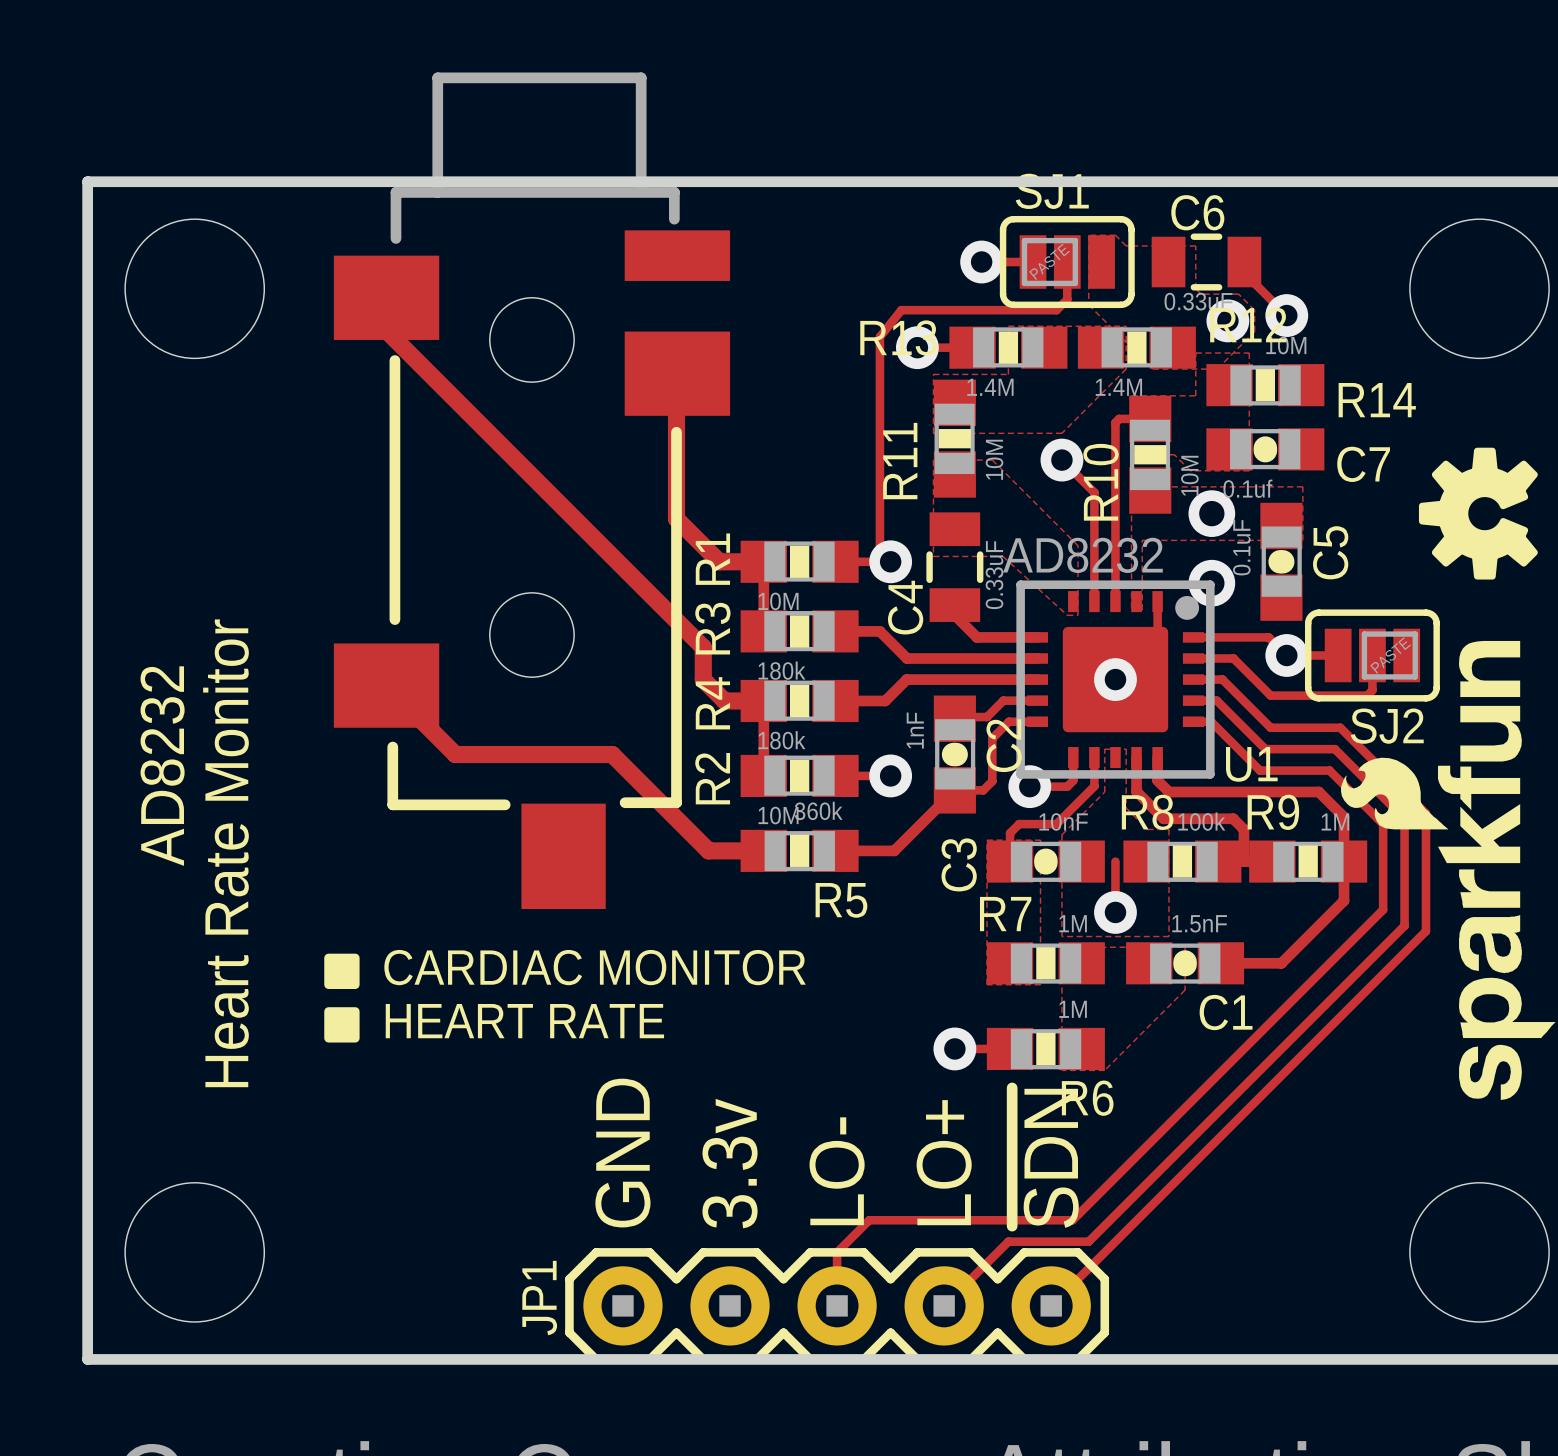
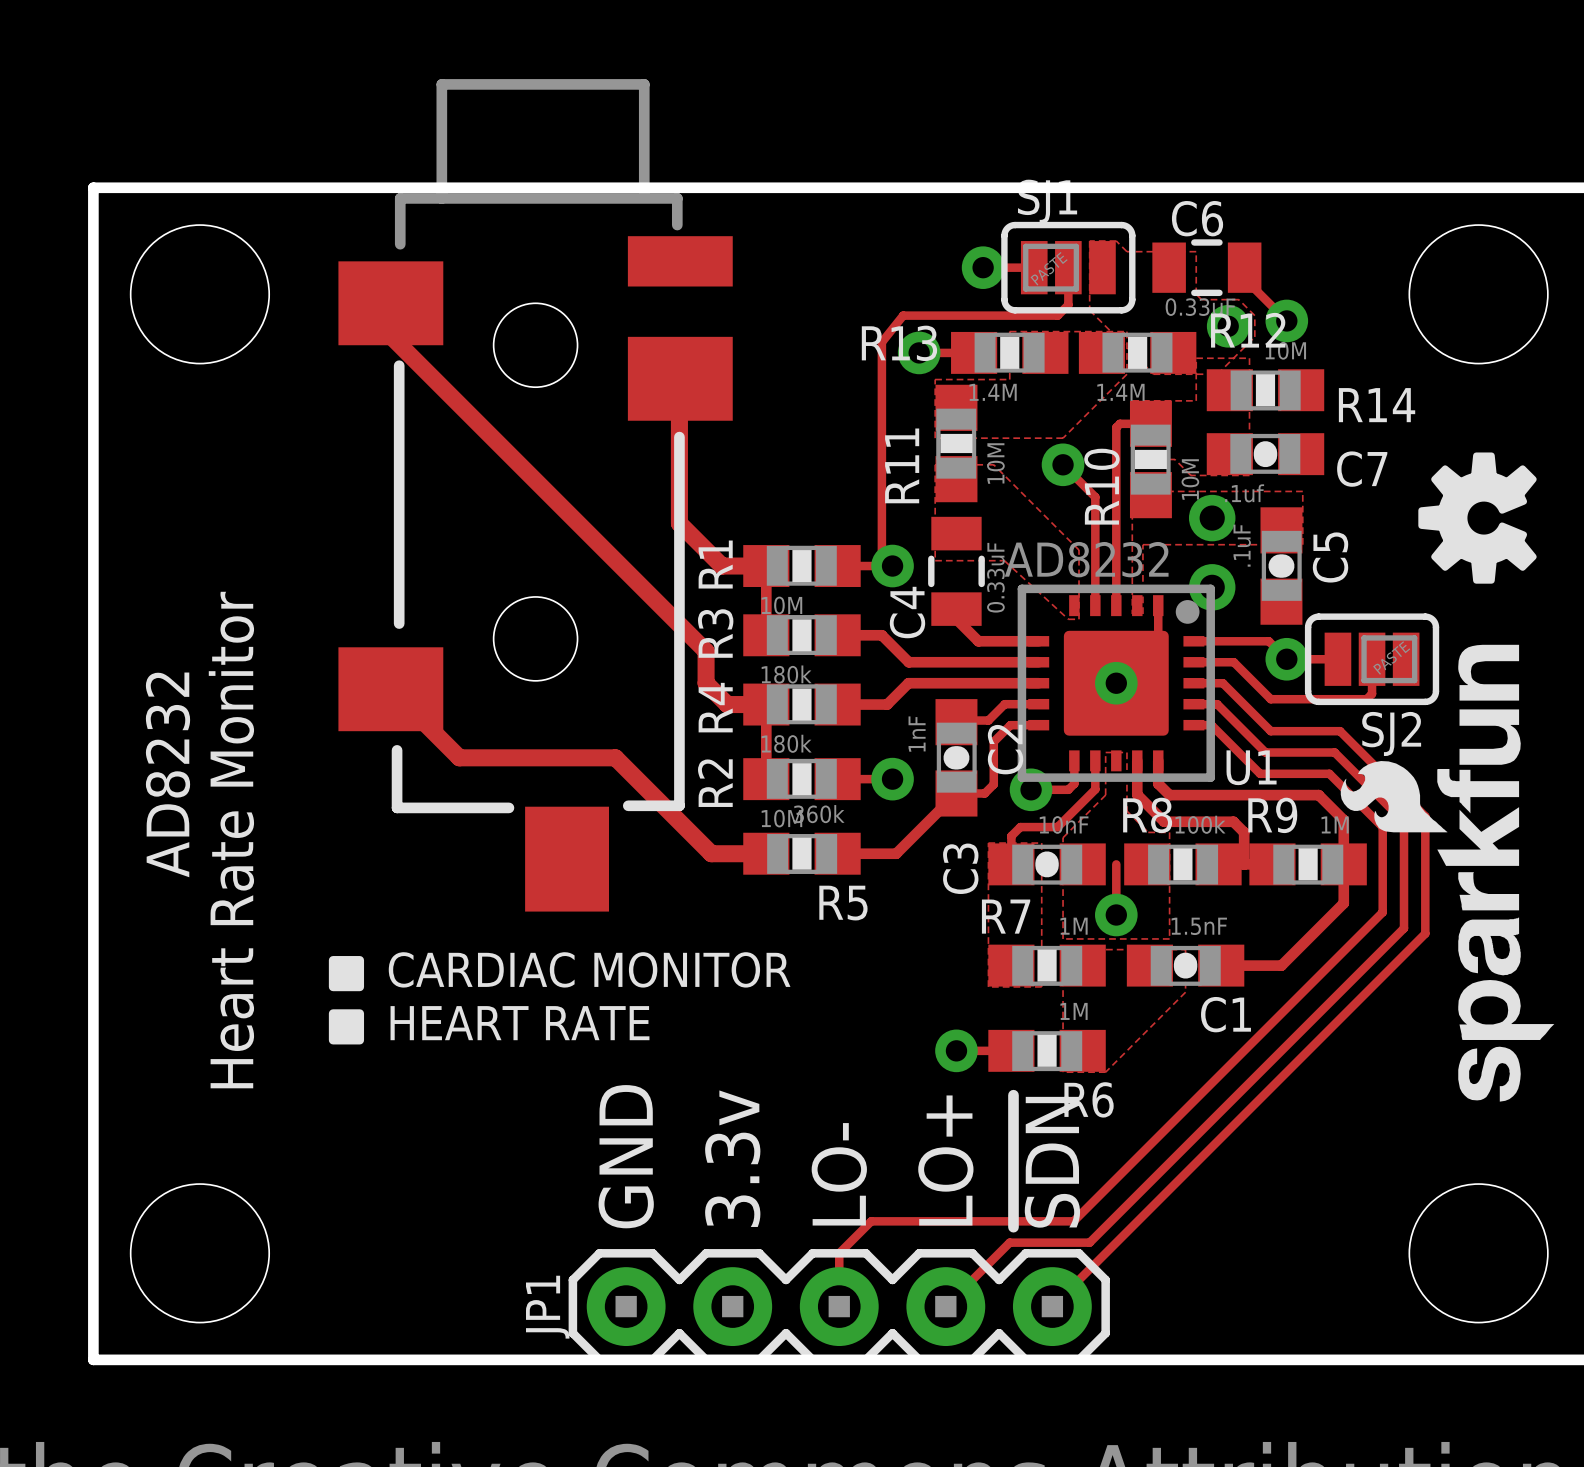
C7 value: 0.1uf (1247, 488) -> .1uf (1244, 493)
C5 value: 0.1uF (1241, 547) -> .1uF (1242, 545)

